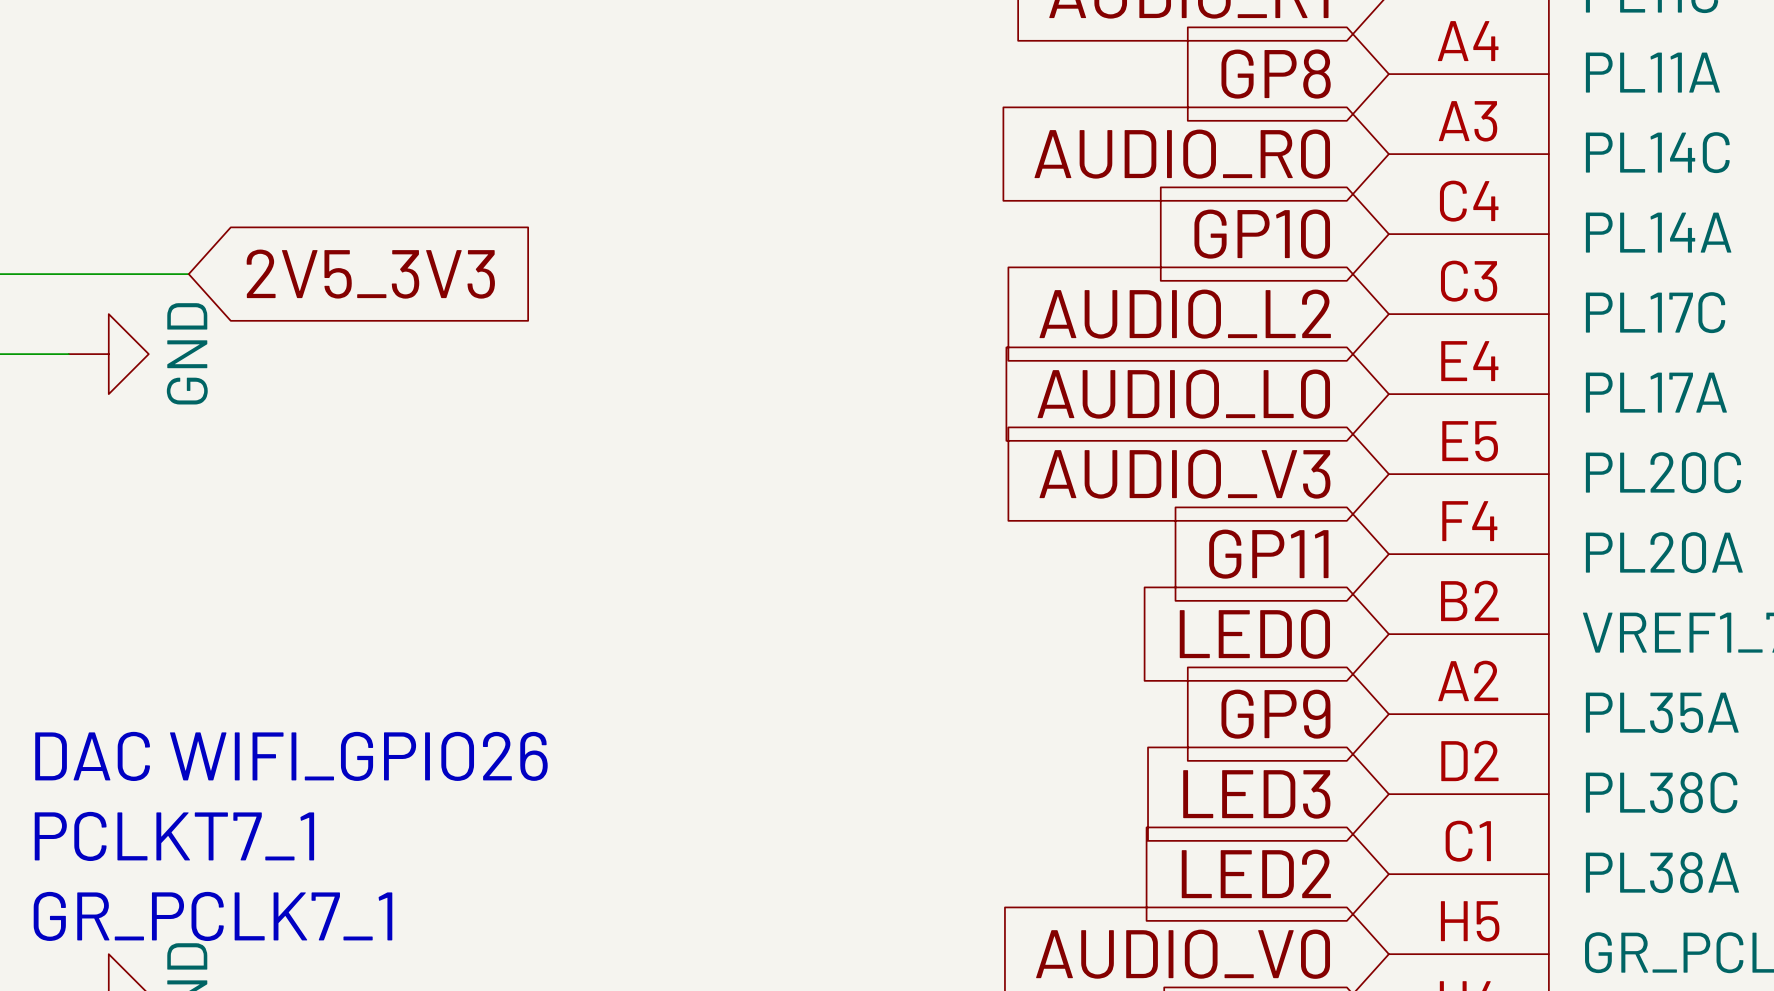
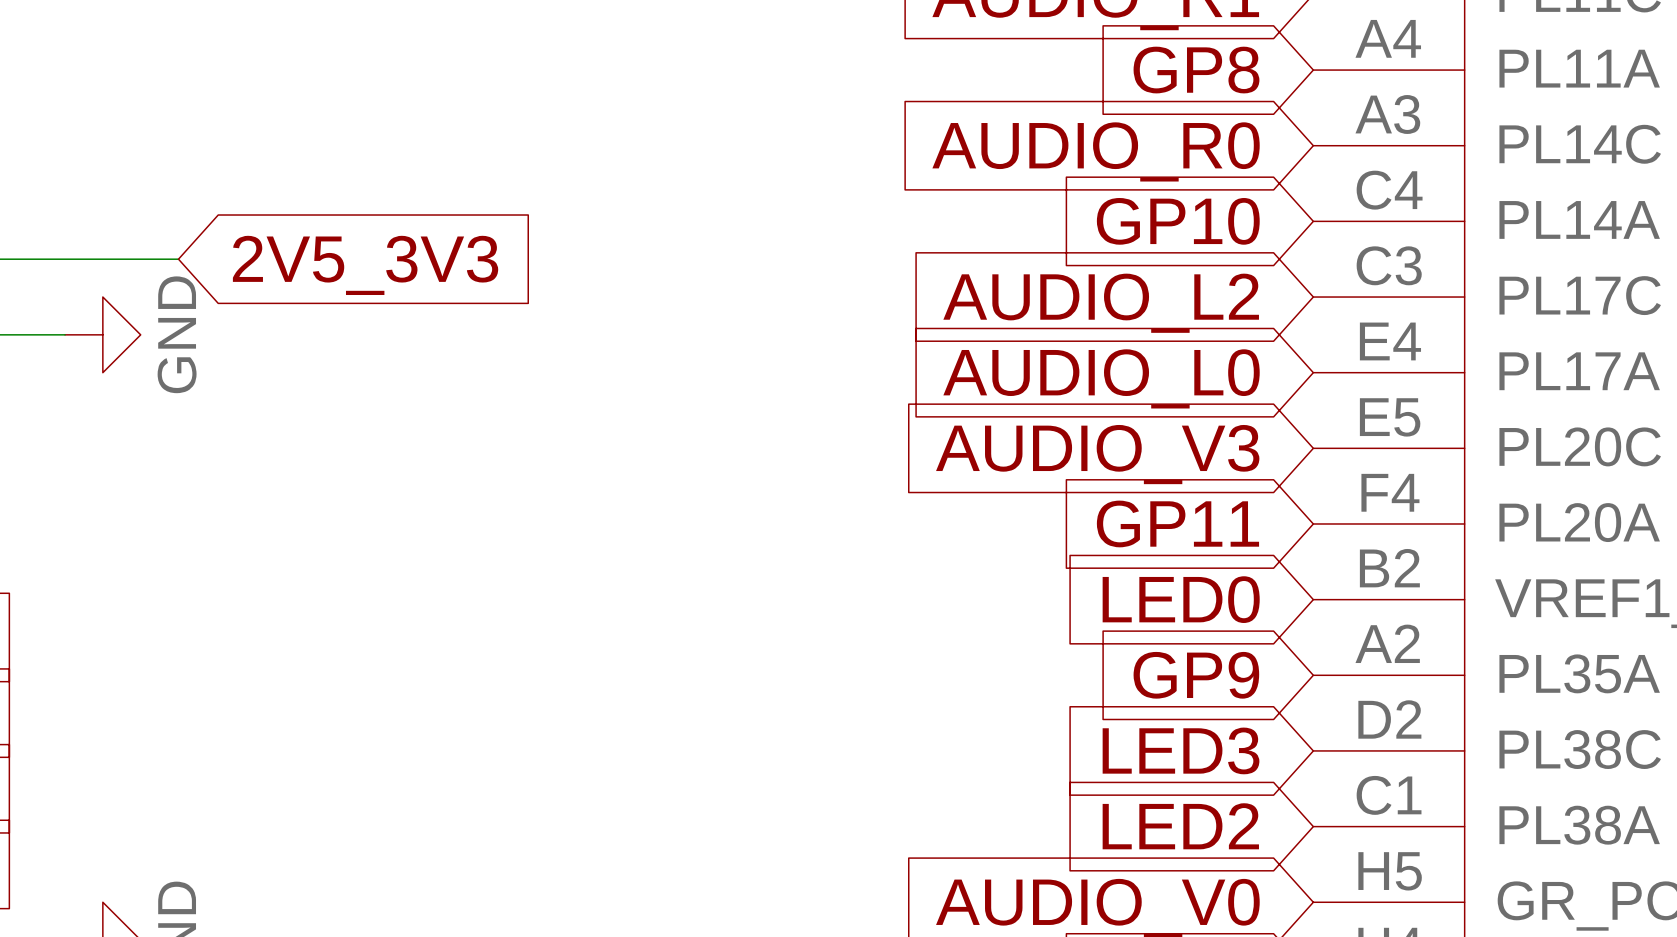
text: DAC WIFI_GPIO26 (291, 756) -> none
text: PCLKT7_1 (174, 836) -> none
text: GR_PCLK7_1 (213, 916) -> none

